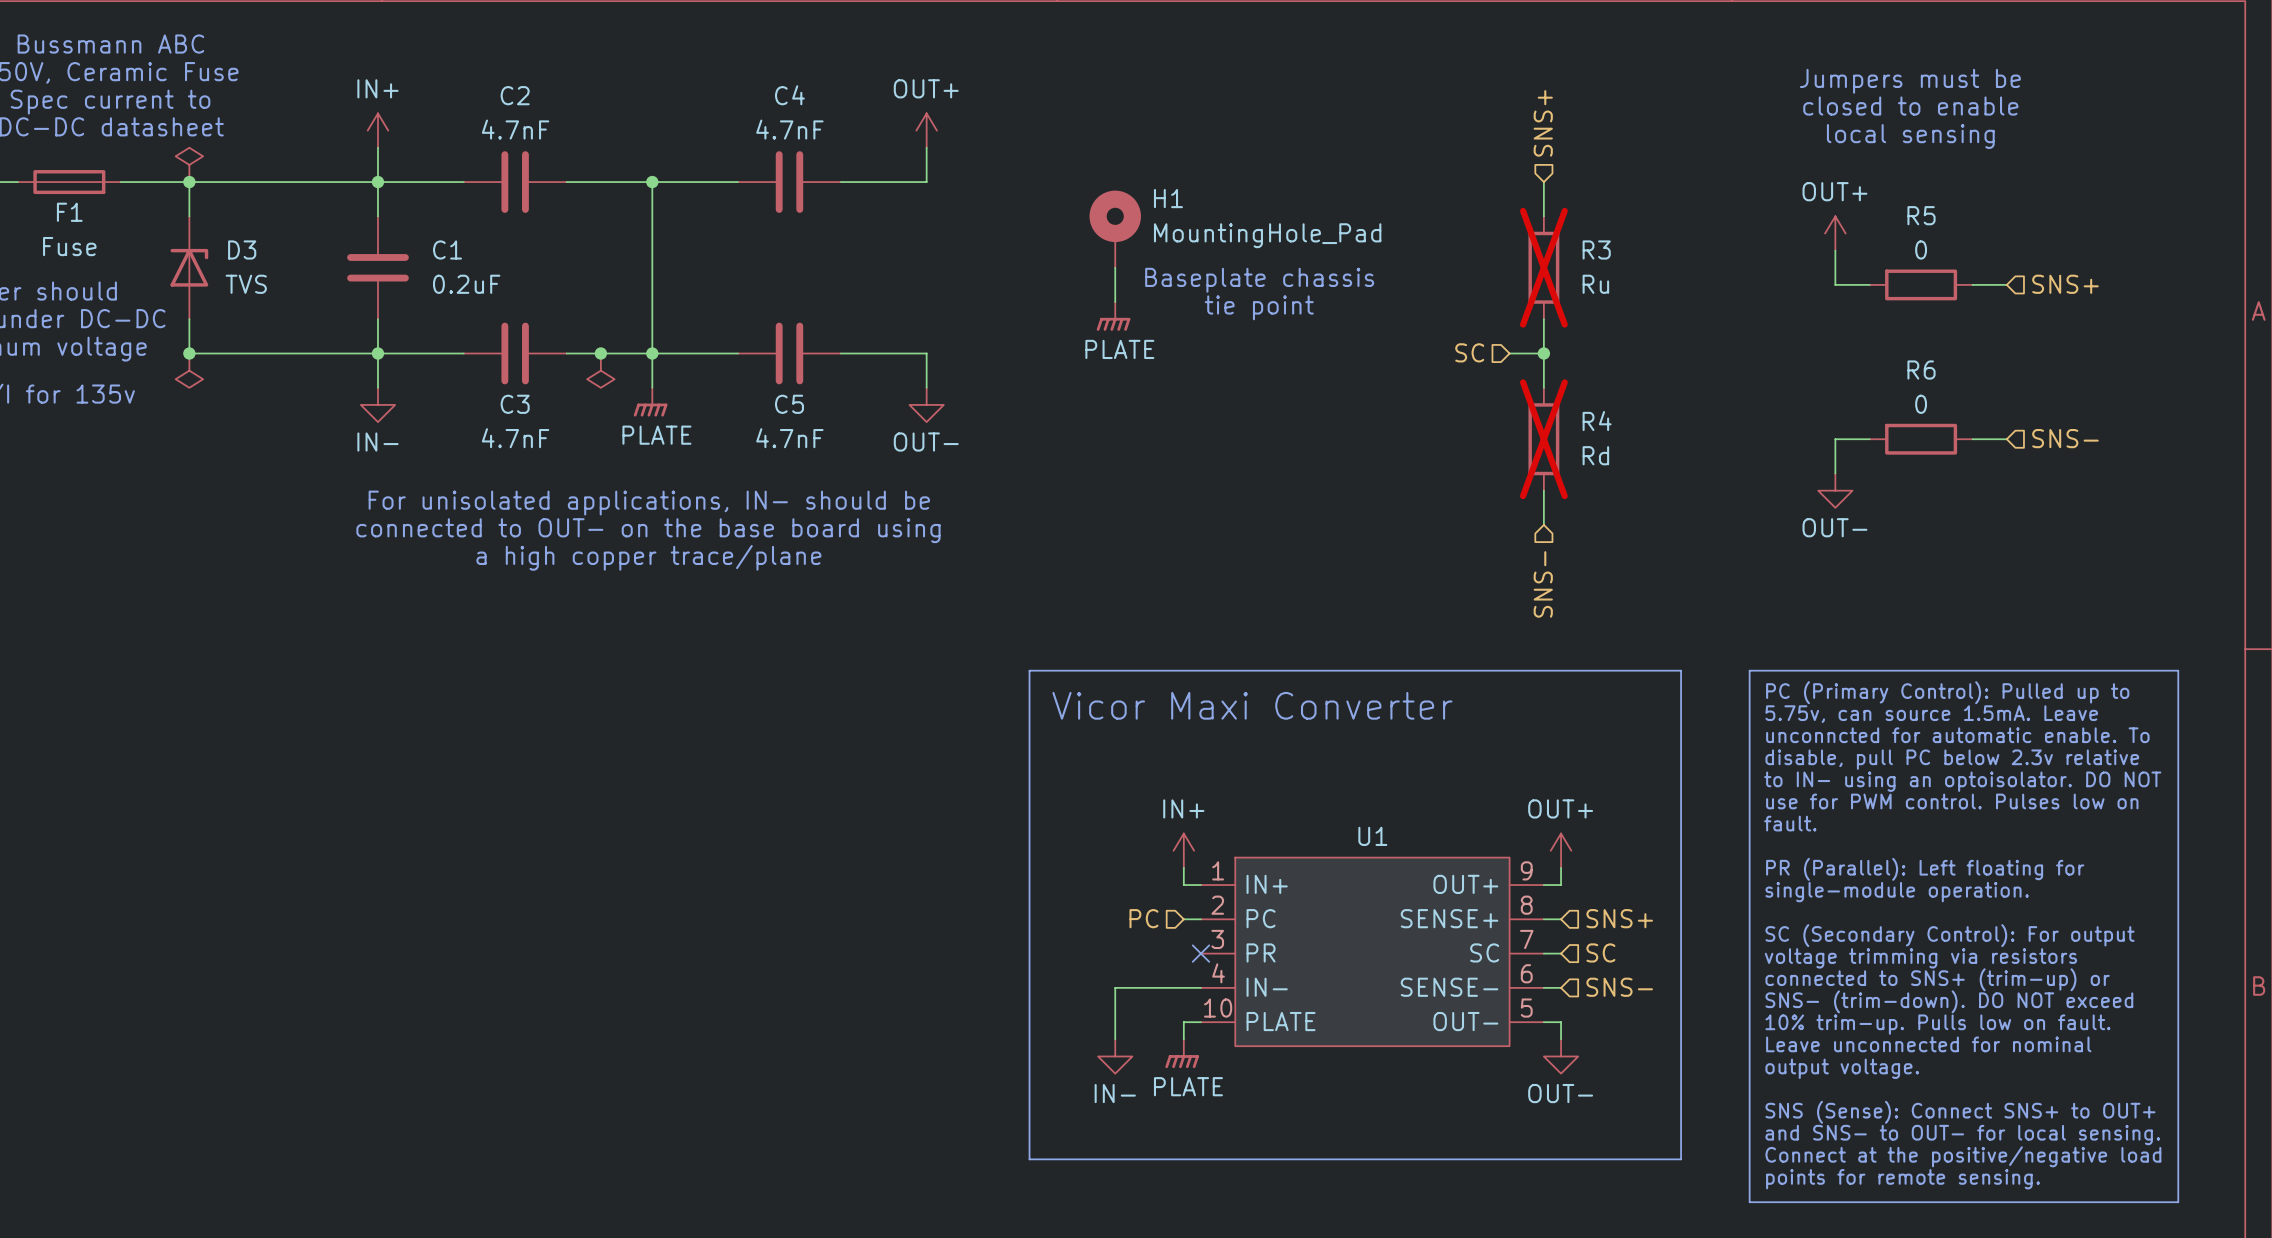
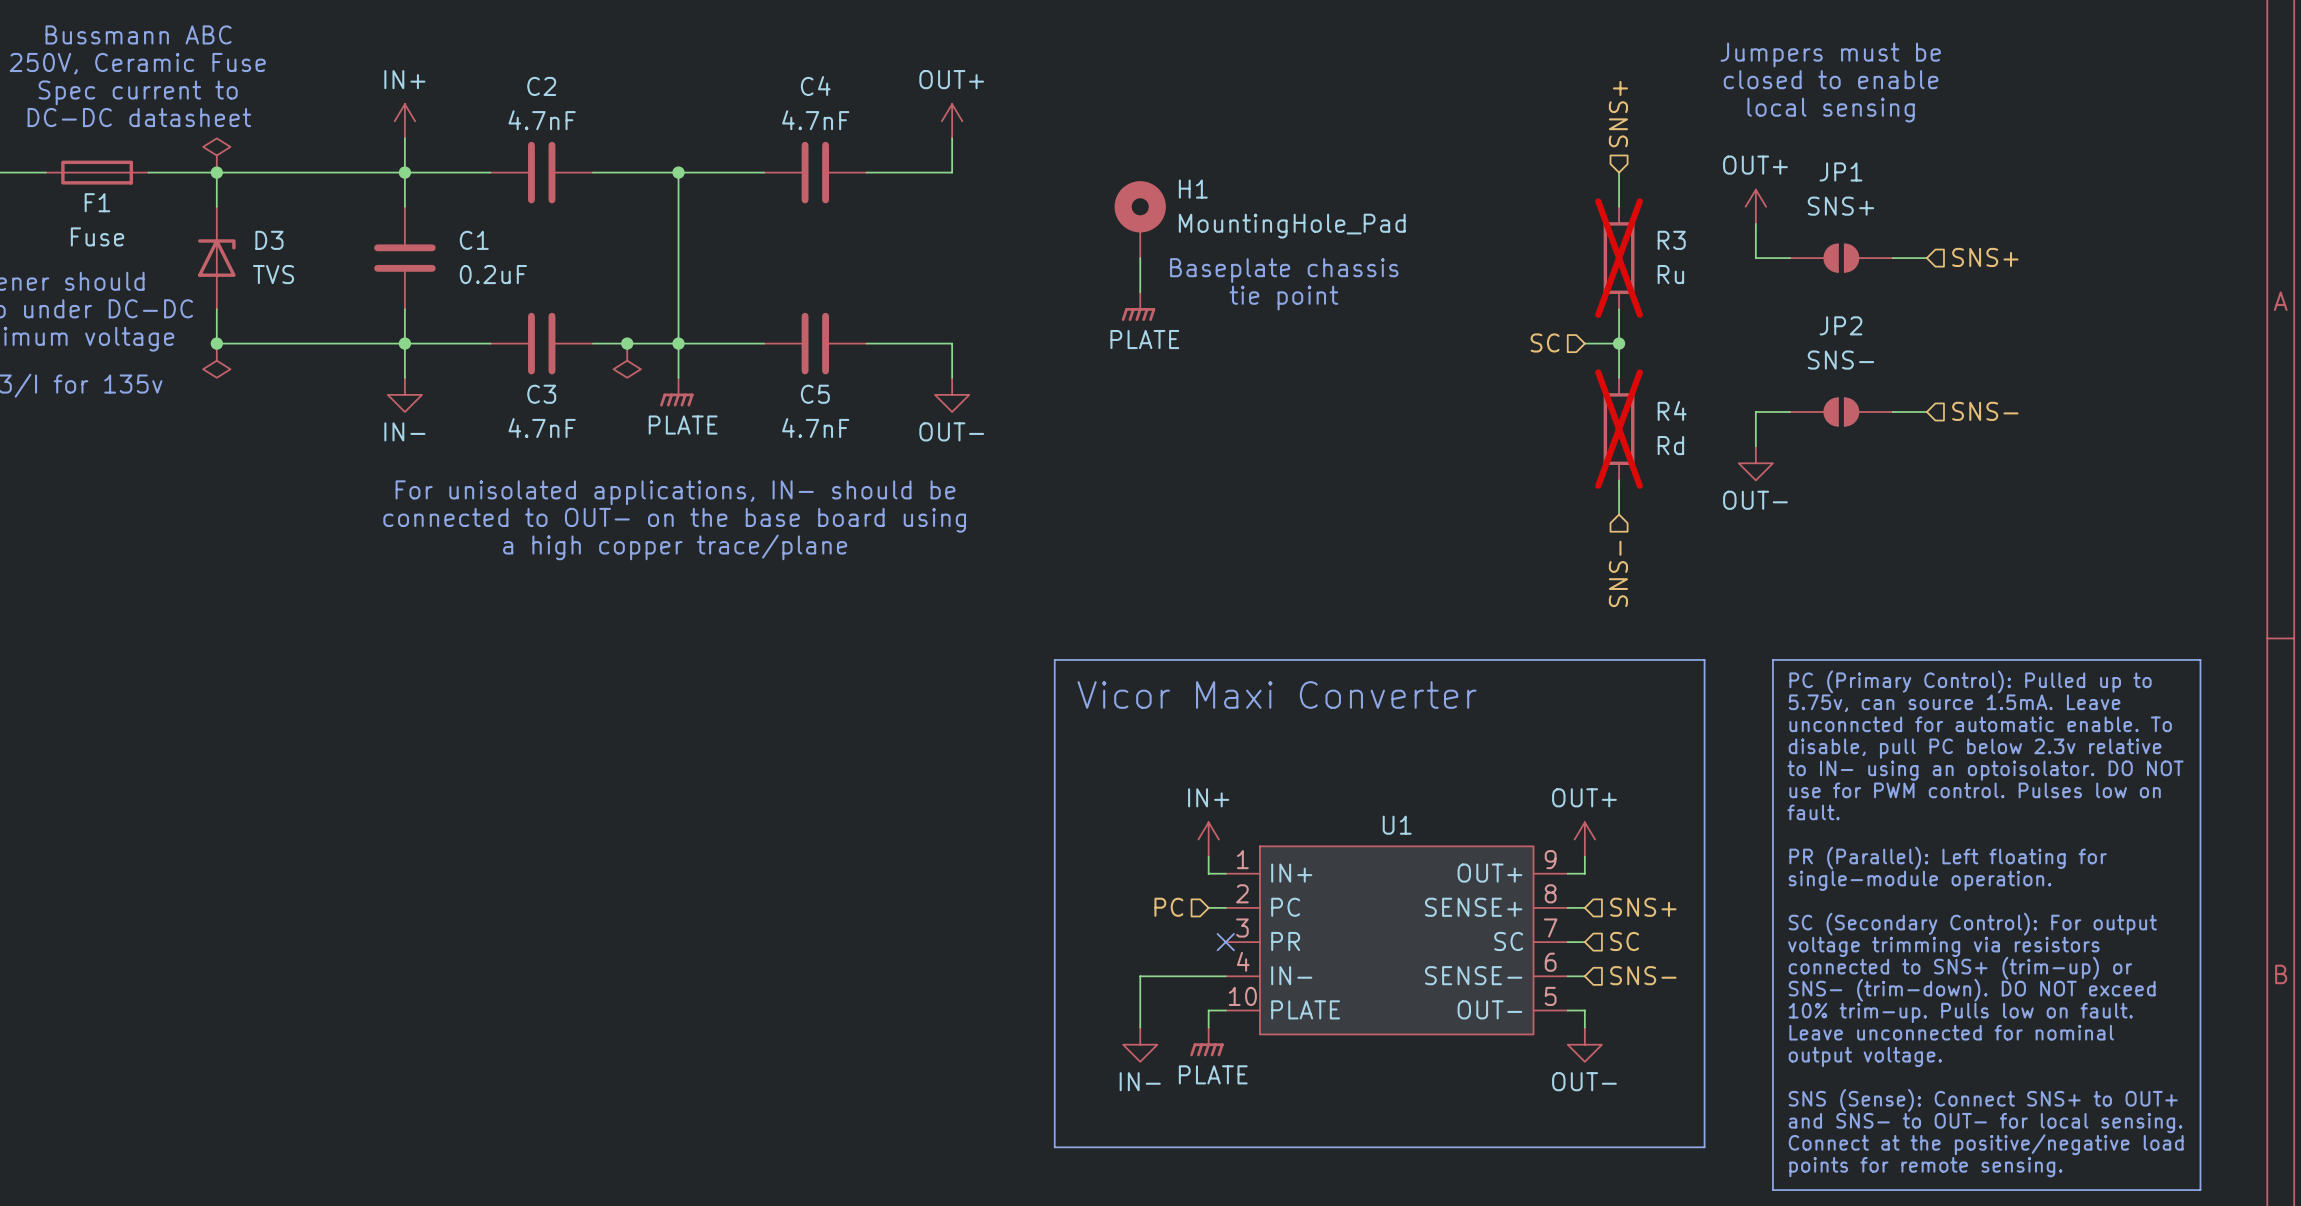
text position: Jumpers must be (1910, 81) -> Jumpers must be (1830, 54)
text position: closed to enable (1910, 106) -> closed to enable (1831, 79)
hierarchical label position: SNS+ (1543, 123) -> SNS+ (1618, 114)
text position: local sensing (1910, 136) -> local sensing (1831, 110)
wire: (1543, 182) (1543, 216) -> (1619, 172) (1619, 206)
power symbol position: OUT+ (1835, 233) -> OUT+ (1755, 206)
wire: (1835, 250) (1835, 284) (1869, 284) -> (1755, 223) (1755, 258) (1790, 258)
R3 position: (1543, 267) -> (1619, 258)
JP1: none -> SNS+ (1841, 258)
R5: 0 (1921, 284) -> none
wire: (1972, 284) (2006, 284) -> (1892, 258) (1926, 258)
hierarchical label position: SNS+ (2065, 284) -> SNS+ (1985, 257)
wire: (1543, 319) (1543, 387) -> (1619, 309) (1619, 377)
hierarchical label position: SC (1469, 352) -> SC (1545, 342)
wire: (1509, 353) (1543, 353) -> (1584, 343) (1619, 343)
junction position: (1543, 353) -> (1619, 343)
JP2: none -> SNS- (1841, 411)
hierarchical label position: SNS- (2065, 438) -> SNS- (1985, 411)
R4 position: (1543, 439) -> (1619, 429)
wire: (1869, 439) (1835, 439) (1835, 473) -> (1790, 411) (1755, 411) (1755, 446)
R6: 0 (1921, 439) -> none
wire: (1972, 439) (2006, 439) -> (1892, 411) (1926, 411)
wire: (1543, 490) (1543, 524) -> (1619, 480) (1619, 514)
power symbol position: OUT- (1835, 490) -> OUT- (1755, 463)
hierarchical label position: SNS- (1543, 584) -> SNS- (1618, 573)

